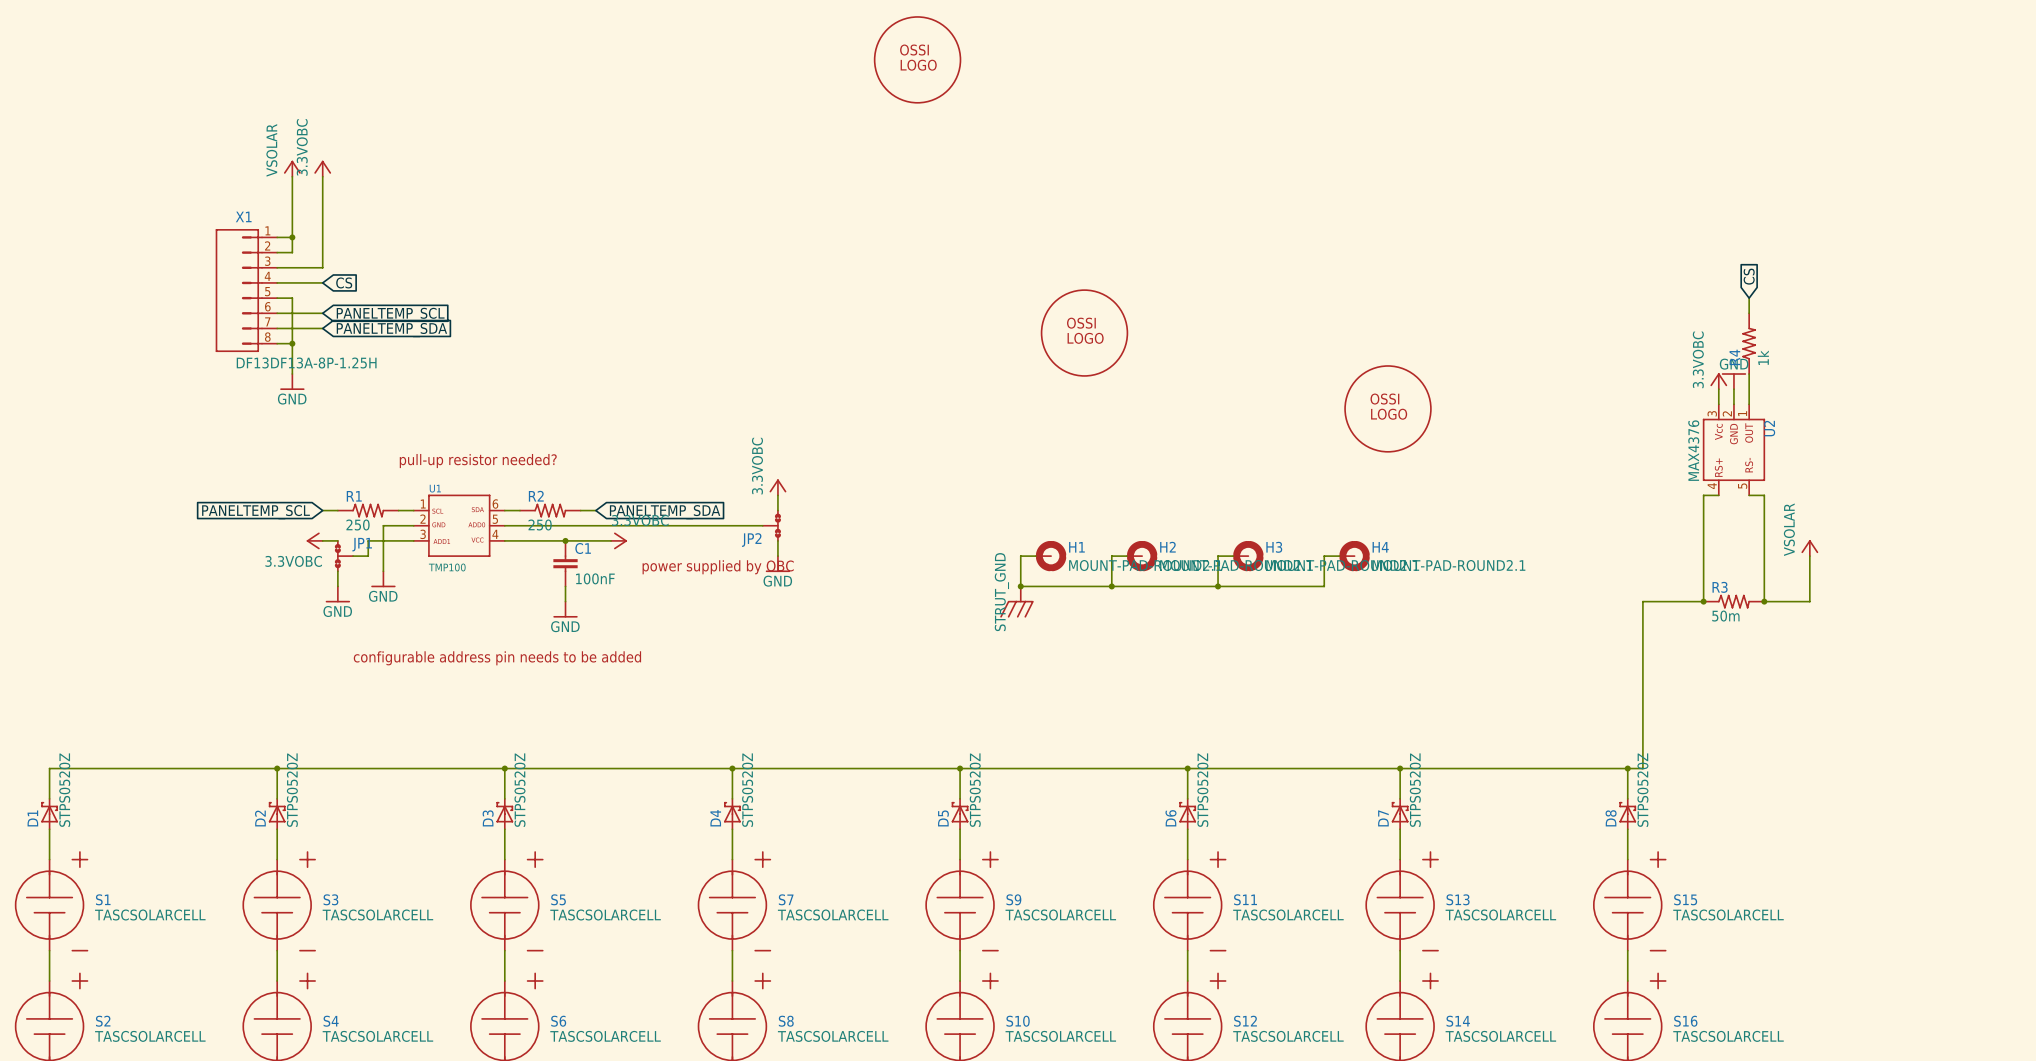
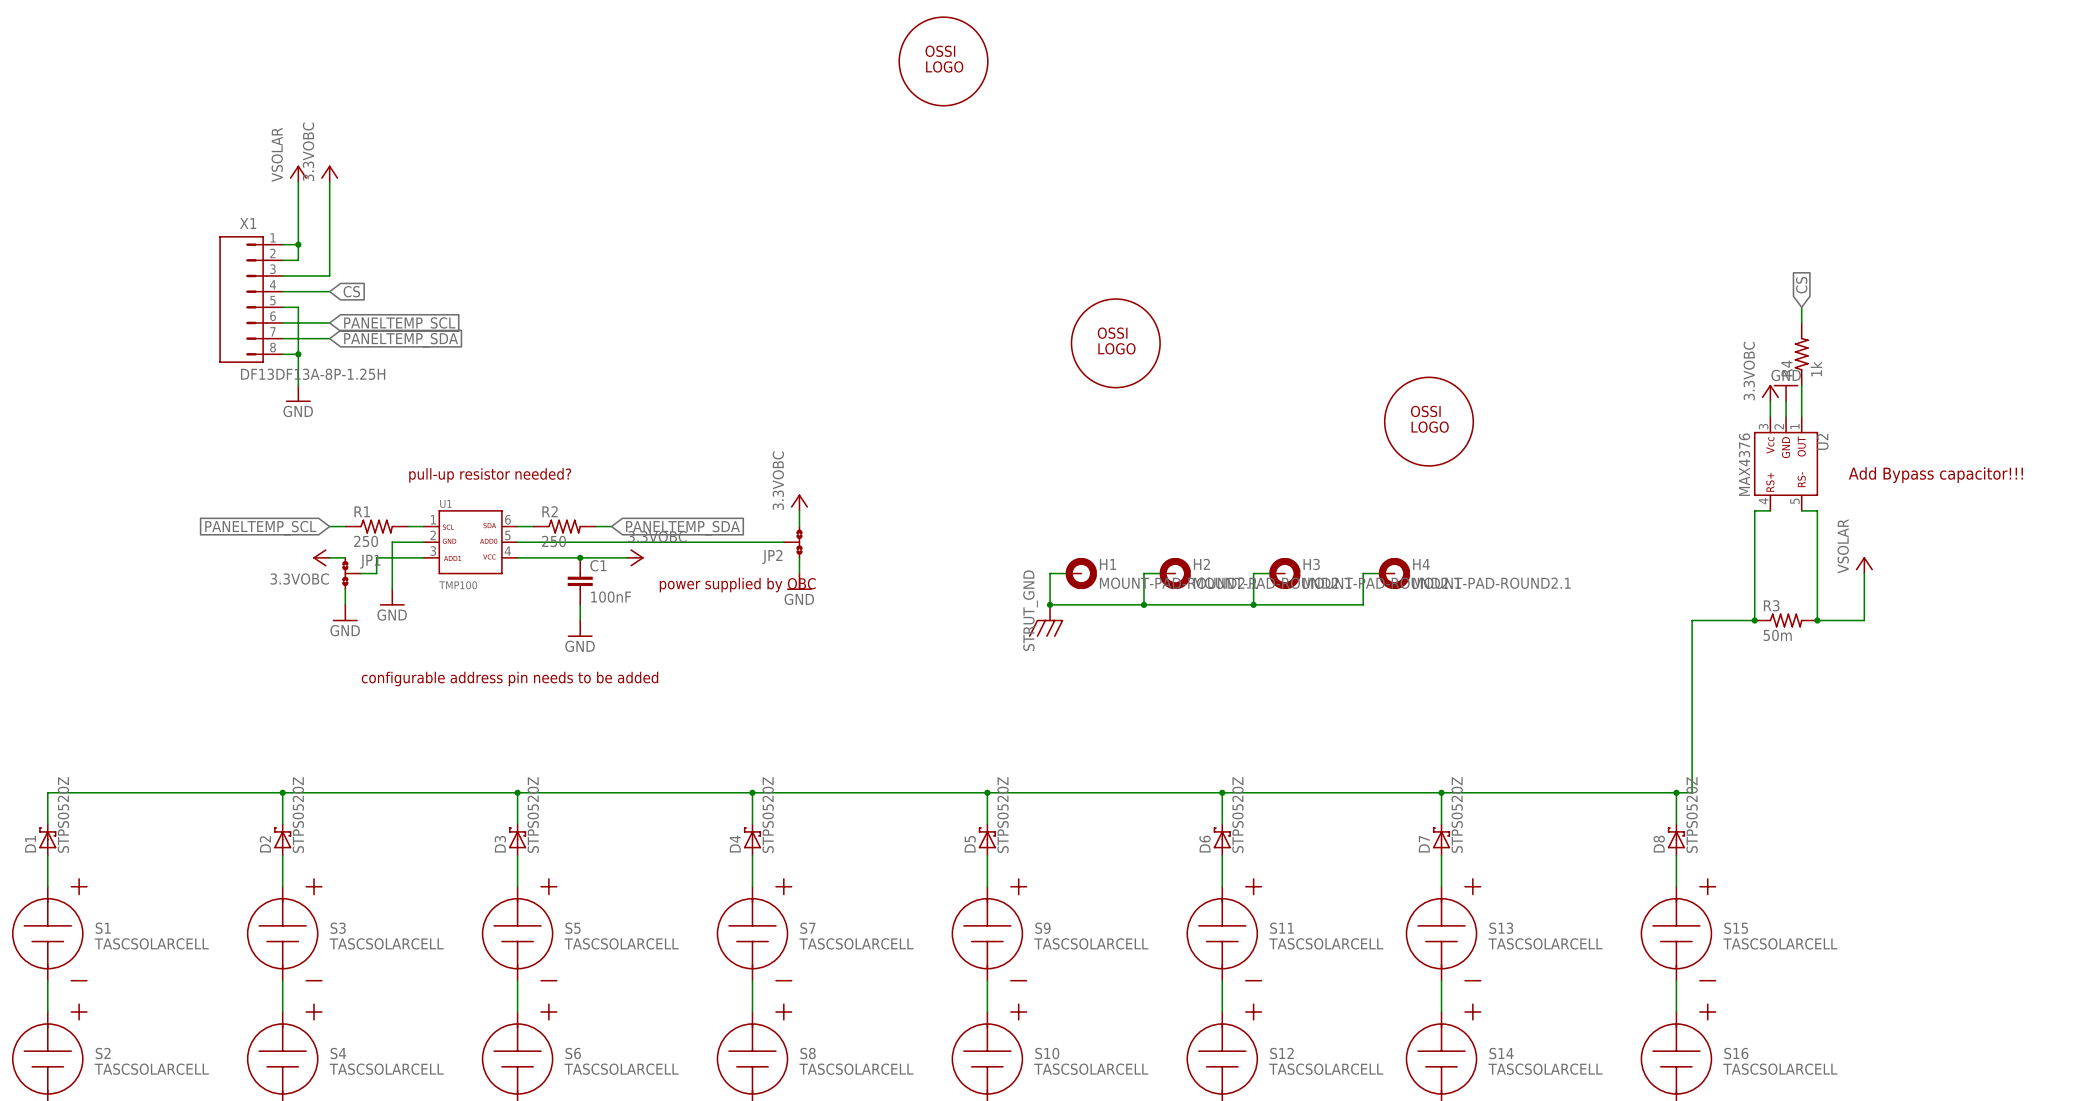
text: none -> Add Bypass capacitor!!! (1935, 475)

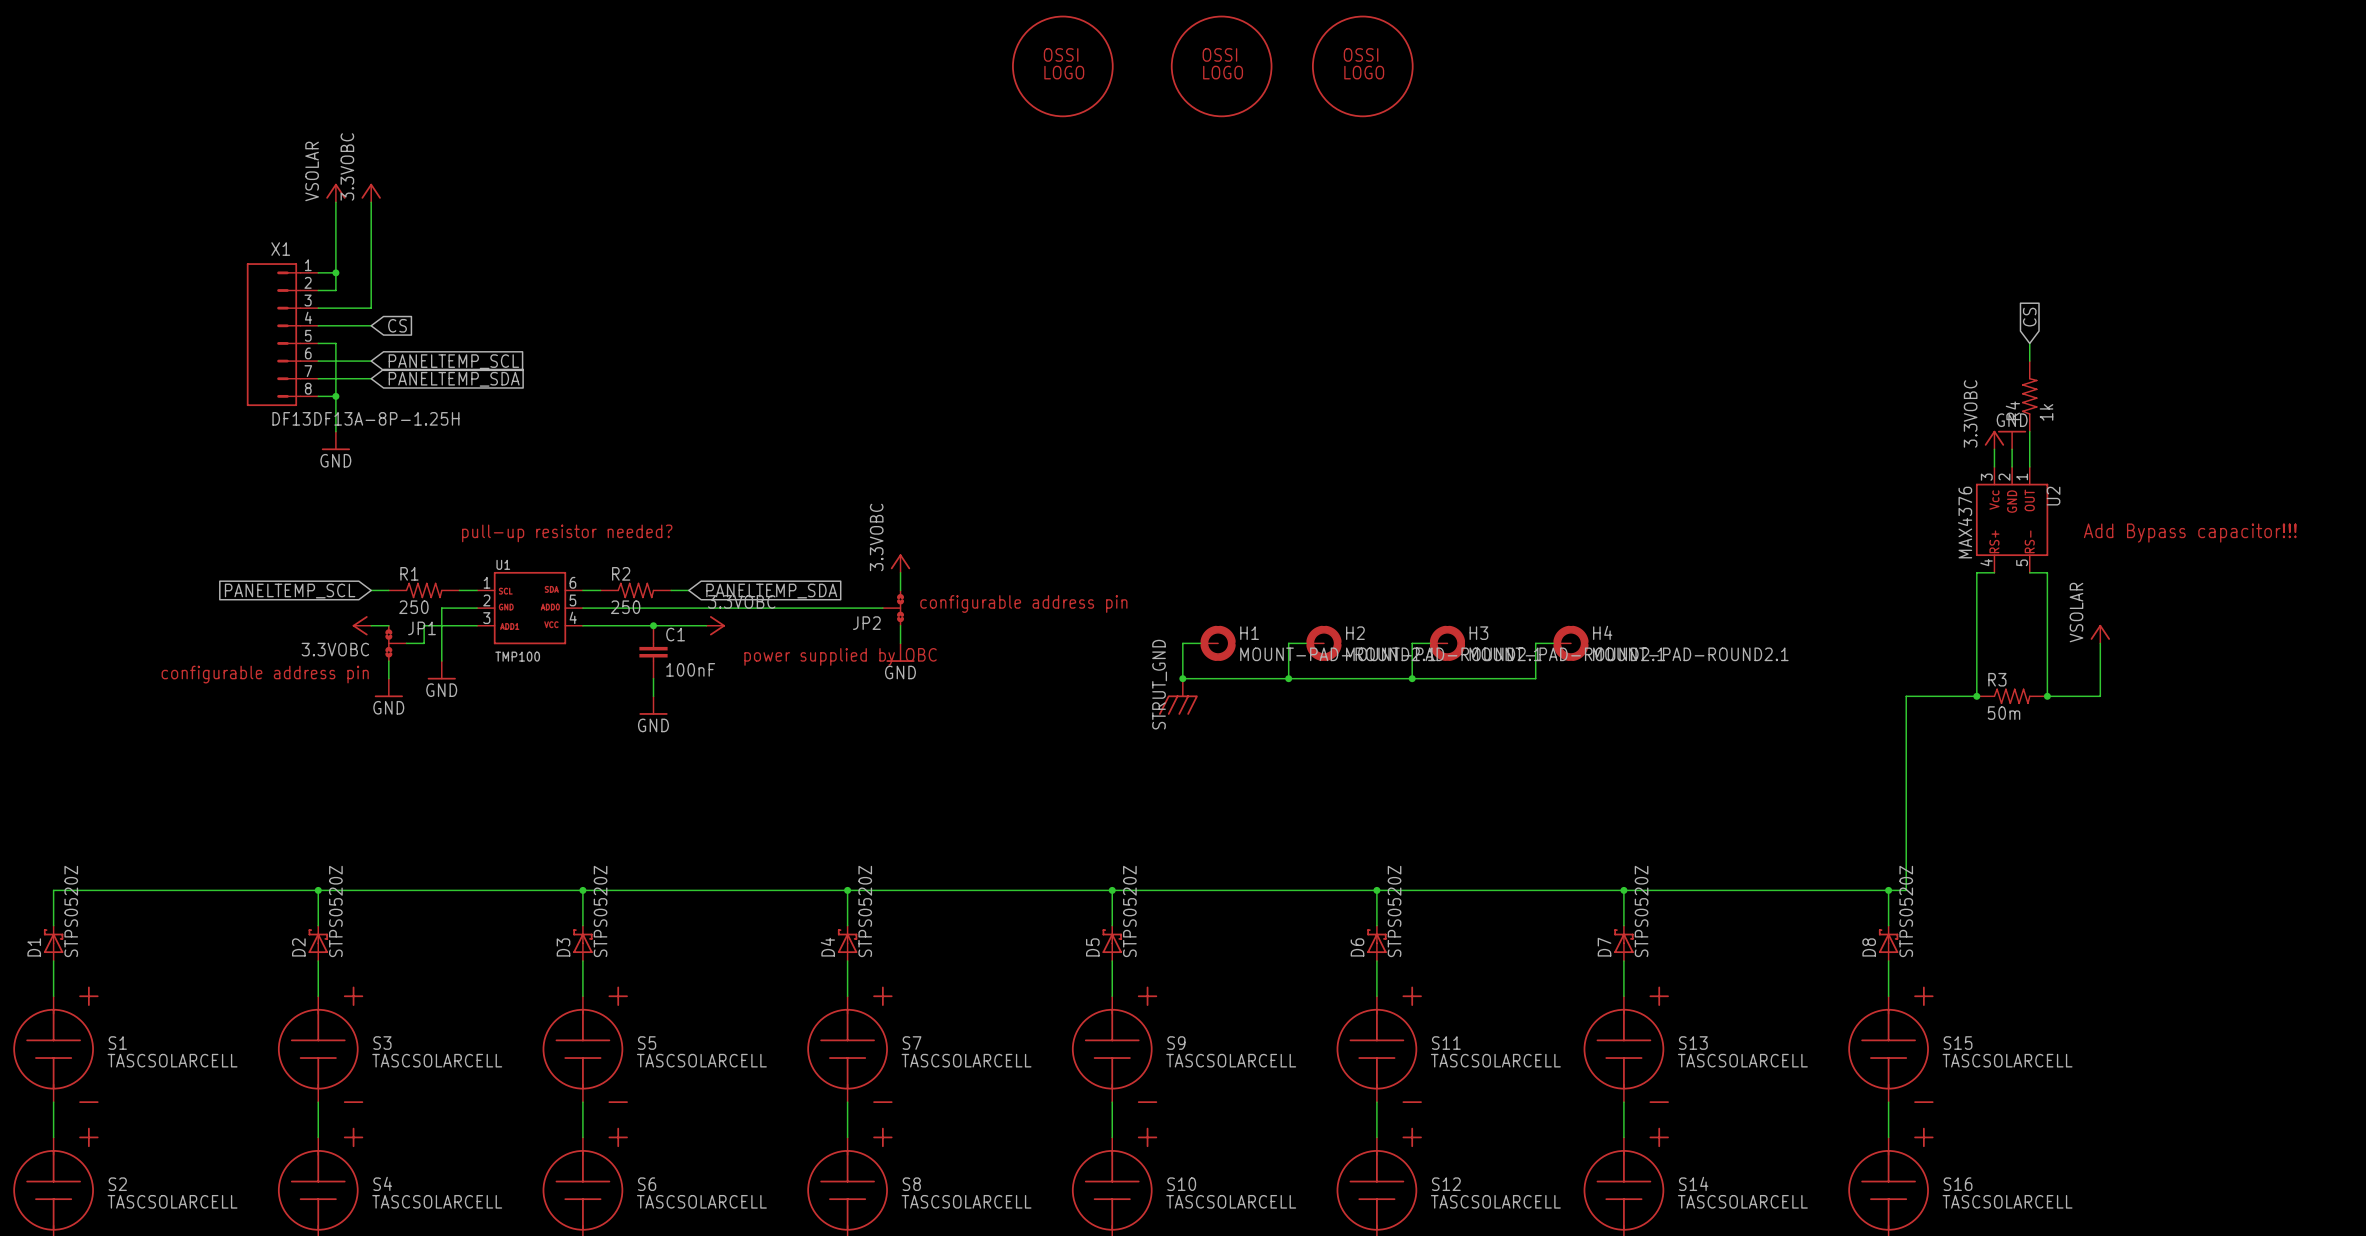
part: none -> (1221, 66)
part: none -> (1362, 66)
part: (1115, 343) -> none
part: (1428, 421) -> none
text: none -> configurable address pin (1023, 603)
text: none -> configurable address pin (265, 674)
text: configurable address pin needs to be added (509, 679) -> none

